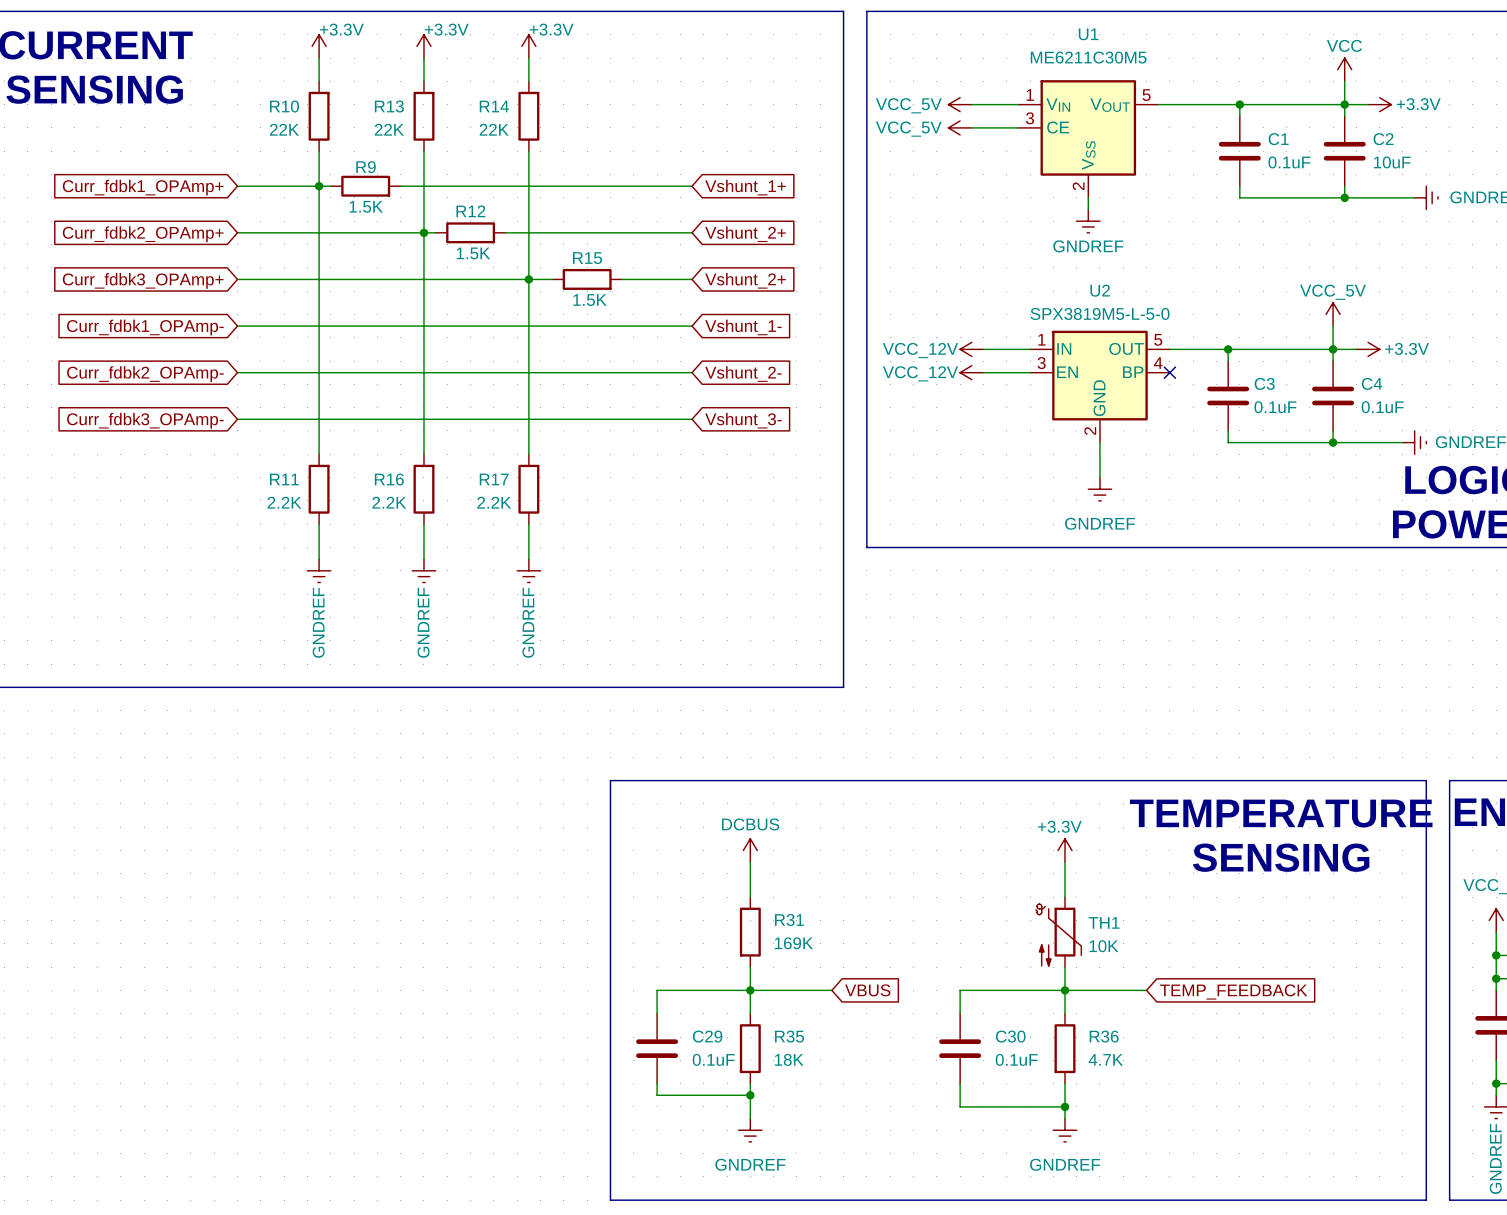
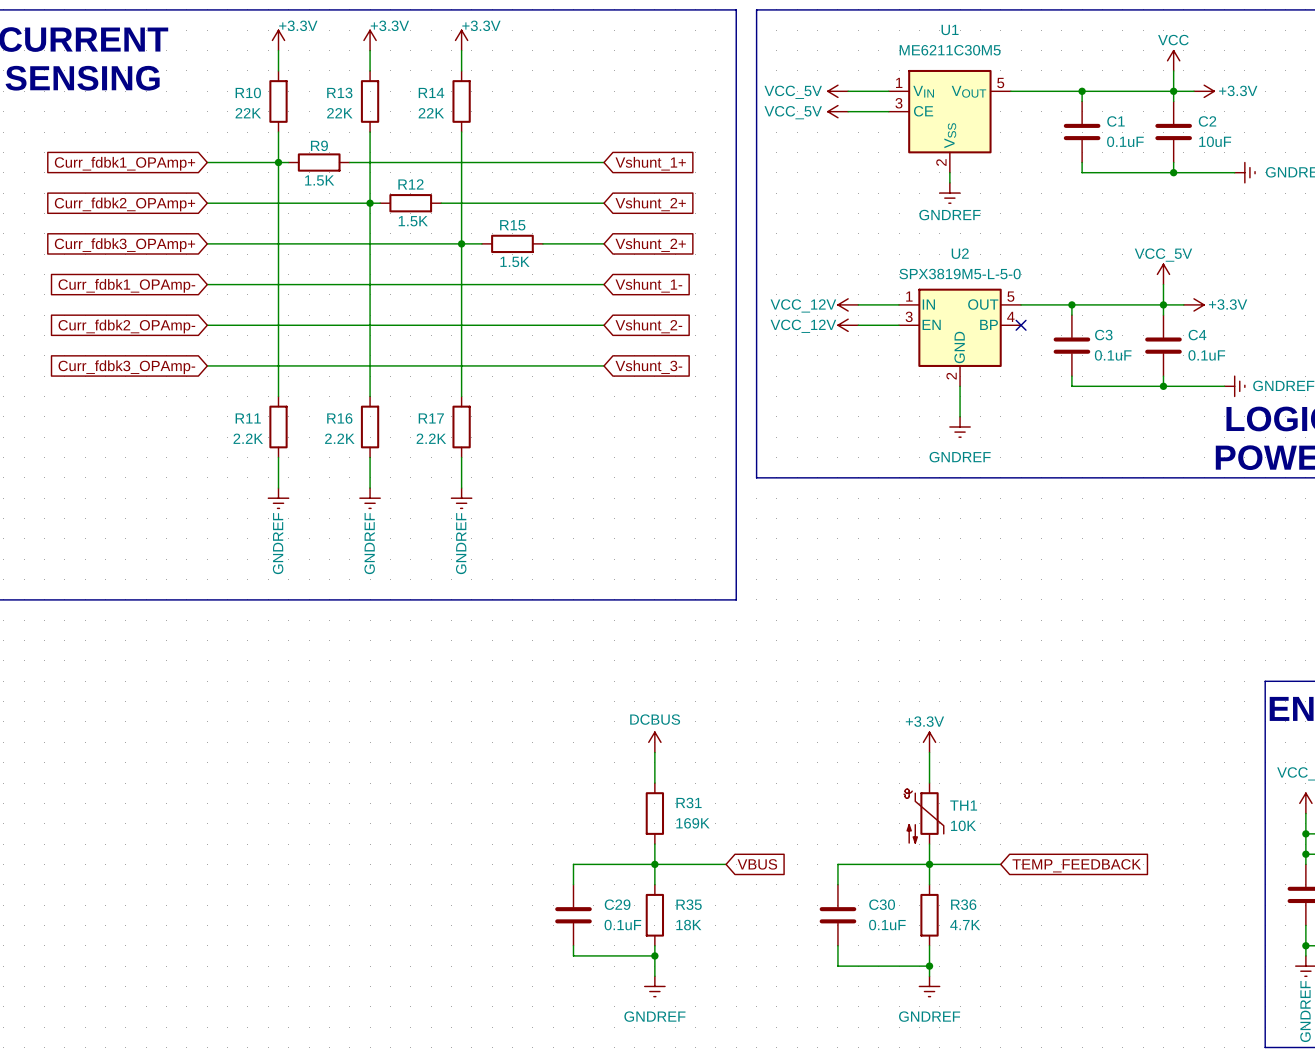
line: (610, 780) (1426, 780) (1426, 1200) (610, 1200) (610, 780) -> none
text: TEMPERATURE (1281, 813) -> none
text: SENSING (1281, 857) -> none

